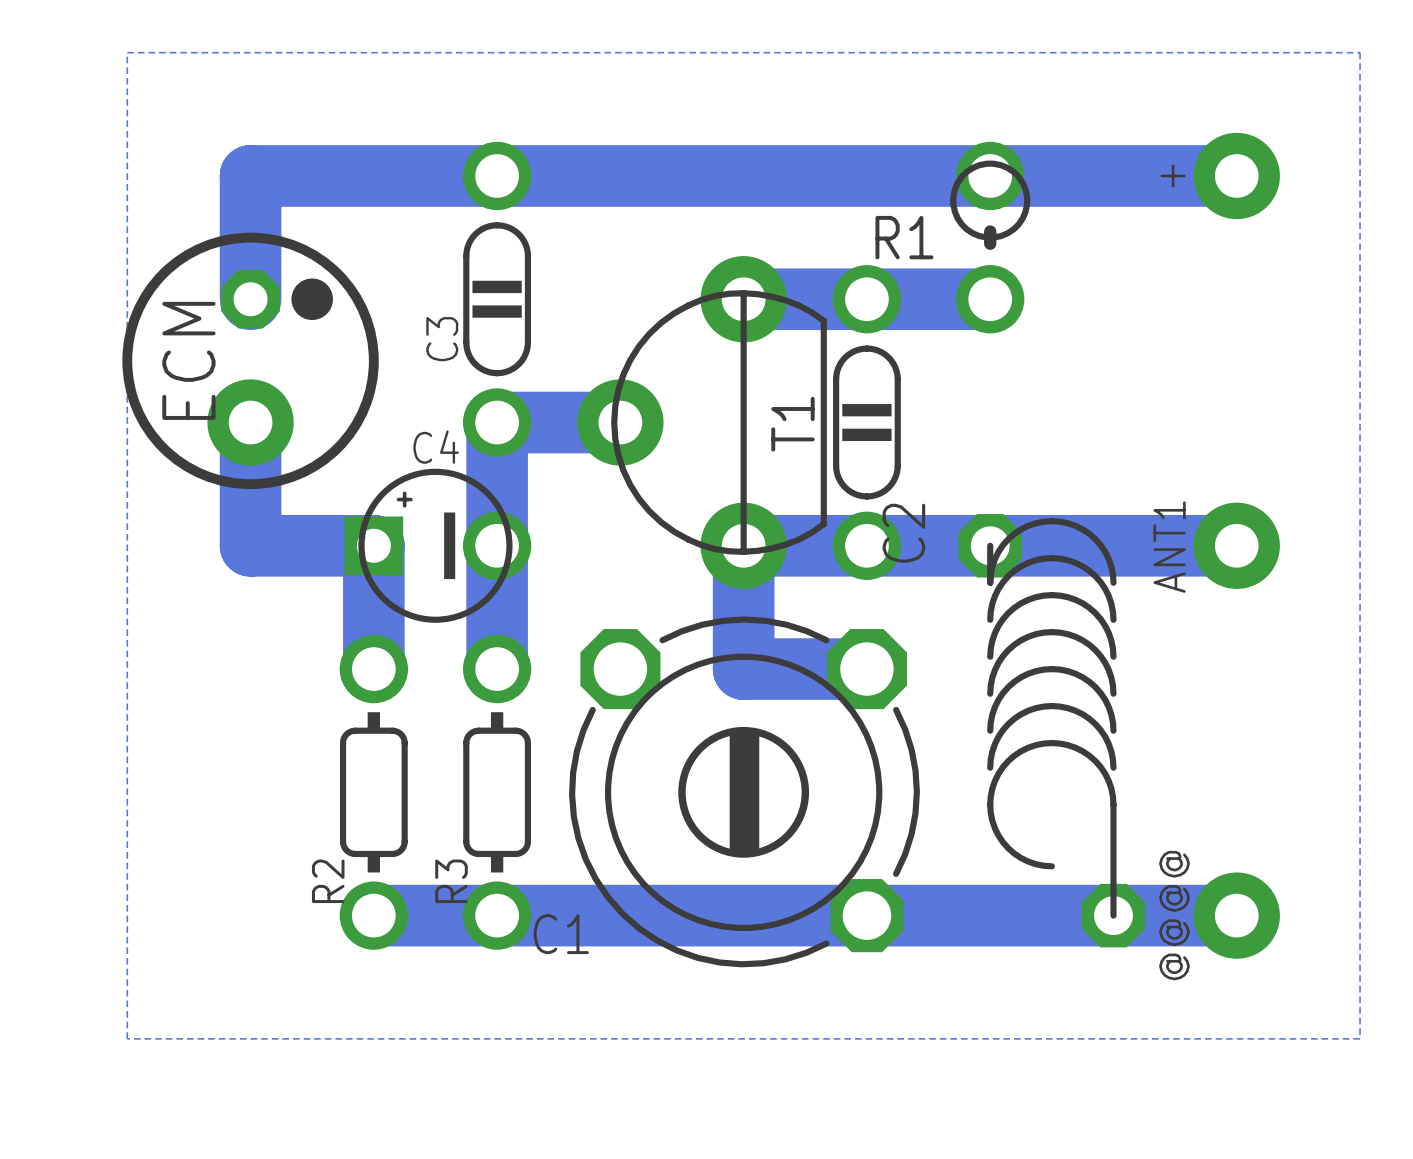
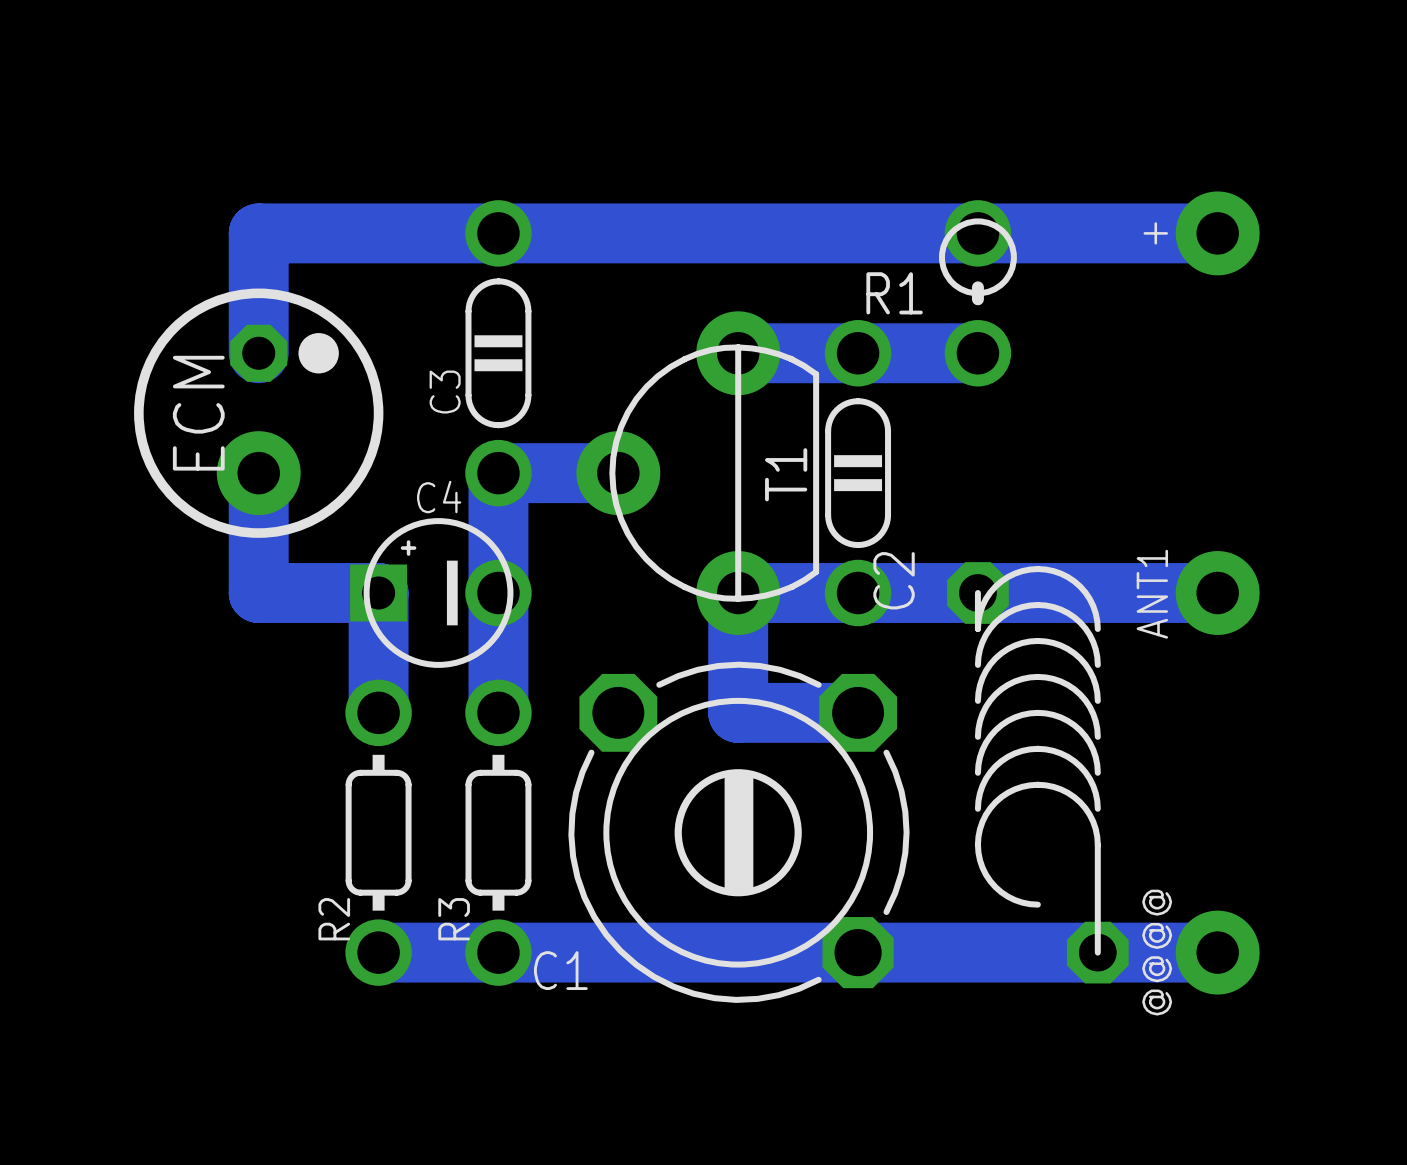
bottom zone outline: (127, 52) (127, 1038) (1360, 1038) (1360, 52) (127, 52) -> none

